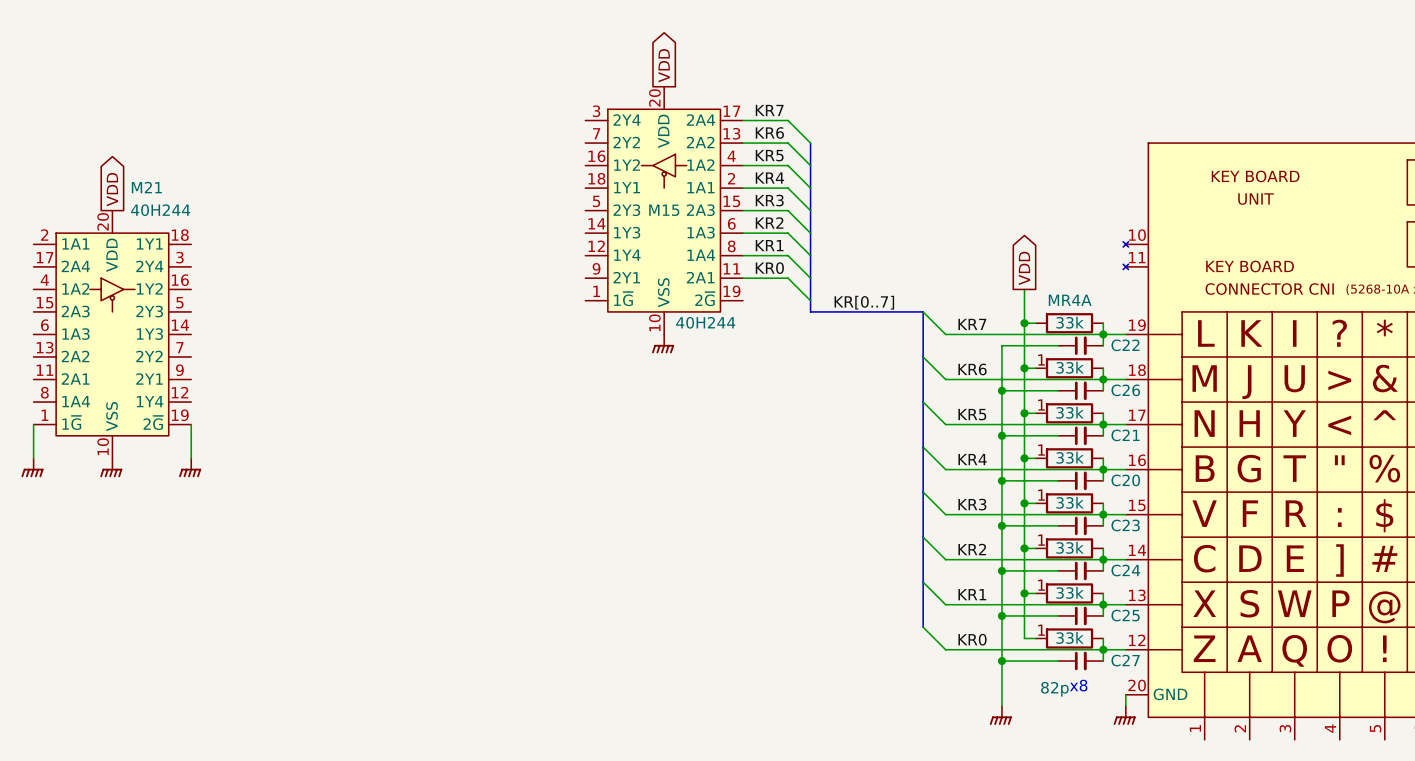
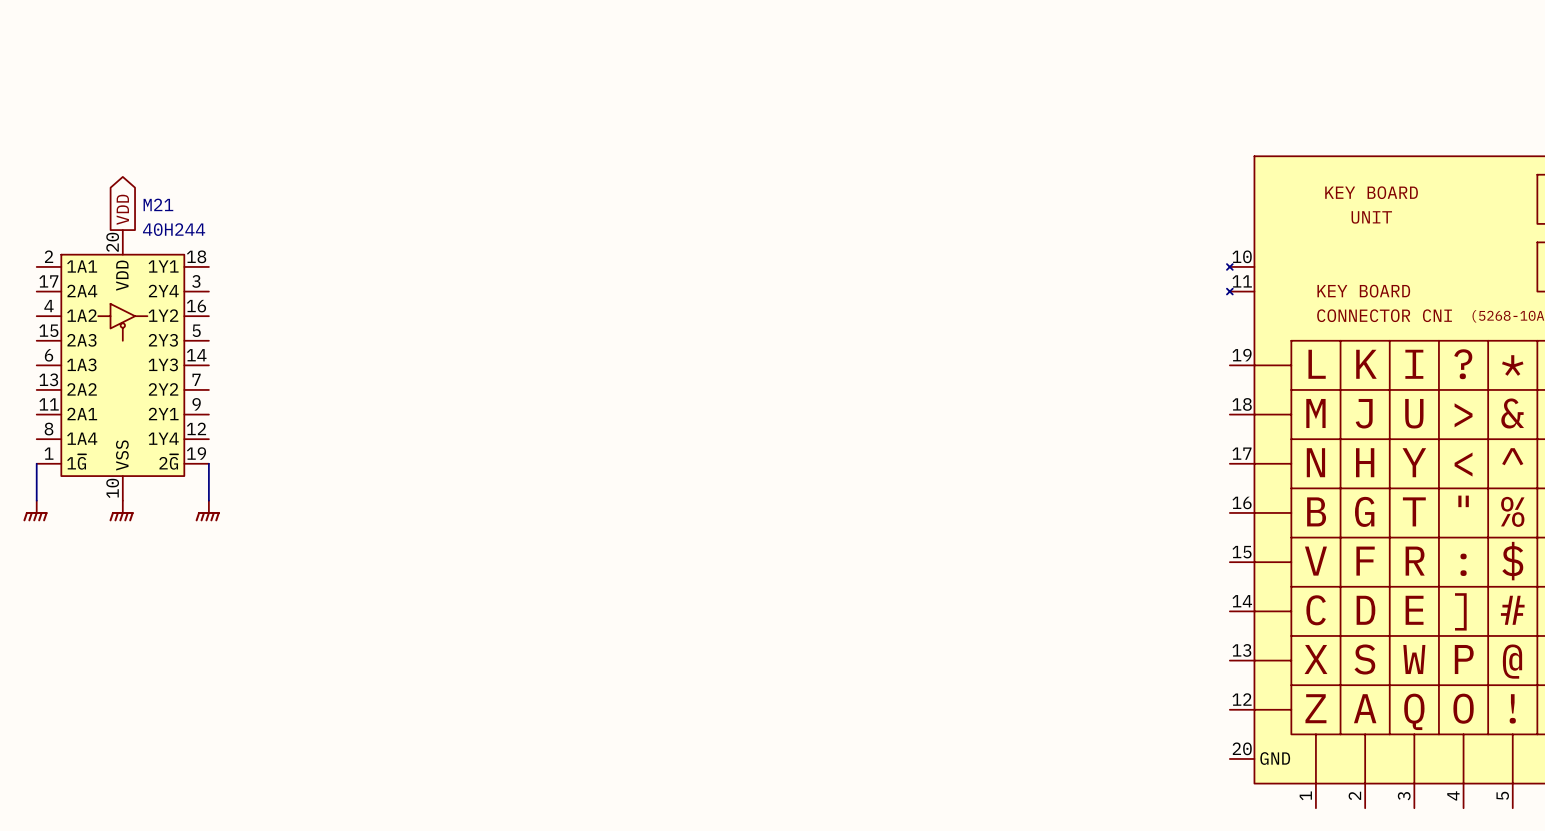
global label: VDD (664, 65) -> none
label: KR7 (769, 110) -> none
wire: (742, 120) (788, 120) (810, 143) -> none
label: KR6 (769, 133) -> none
wire: (742, 143) (788, 143) (810, 165) -> none
bus: (810, 143) (810, 311) (923, 311) (923, 627) -> none
label: KR5 (769, 155) -> none
wire: (742, 165) (788, 165) (810, 188) -> none
label: KR4 (769, 178) -> none
wire: (742, 188) (788, 188) (810, 210) -> none
label: KR3 (769, 200) -> none
M15: 40H244 (664, 210) -> none
wire: (742, 210) (788, 210) (810, 233) -> none
label: KR2 (769, 222) -> none
wire: (742, 233) (788, 233) (810, 255) -> none
label: KR1 (769, 245) -> none
wire: (742, 255) (788, 255) (810, 278) -> none
label: KR0 (769, 268) -> none
global label: VDD (1024, 268) -> none
wire: (742, 278) (788, 278) (810, 300) -> none
wire: (1024, 289) (1024, 638) (1035, 638) -> none
label: KR[0..7] (864, 302) -> none
wire: (923, 311) (945, 334) (1125, 334) -> none
wire: (1024, 323) (1035, 323) -> none
junction: (1024, 323) -> none
MR4A: 33k (1069, 323) -> none
wire: (1103, 323) (1103, 345) -> none
label: KR7 (972, 324) -> none
junction: (1103, 334) -> none
power symbol: (663, 343) -> none
wire: (1058, 345) (1001, 345) (1001, 706) -> none
C22: (1080, 345) -> none
wire: (923, 356) (945, 379) (1125, 379) -> none
wire: (1024, 368) (1035, 368) -> none
junction: (1024, 368) -> none
part: 33k (1069, 368) -> none
wire: (1103, 368) (1103, 390) -> none
label: KR6 (972, 369) -> none
junction: (1103, 379) -> none
wire: (1001, 390) (1058, 390) -> none
junction: (1001, 390) -> none
C26: (1080, 390) -> none
wire: (923, 402) (945, 424) (1125, 424) -> none
wire: (1024, 413) (1035, 413) -> none
junction: (1024, 413) -> none
part: 33k (1069, 413) -> none
wire: (1103, 413) (1103, 435) -> none
label: KR5 (972, 414) -> none
junction: (1103, 424) -> none
wire: (1001, 435) (1058, 435) -> none
junction: (1001, 435) -> none
C21: (1080, 435) -> none
wire: (923, 447) (945, 469) (1125, 469) -> none
wire: (1024, 458) (1035, 458) -> none
junction: (1024, 458) -> none
part: 33k (1069, 458) -> none
wire: (1103, 458) (1103, 480) -> none
label: KR4 (972, 459) -> none
junction: (1103, 469) -> none
wire: (1001, 480) (1058, 480) -> none
junction: (1001, 480) -> none
C20: (1080, 480) -> none
wire: (923, 492) (945, 514) (1125, 514) -> none
wire: (1024, 503) (1035, 503) -> none
junction: (1024, 503) -> none
part: 33k (1069, 503) -> none
wire: (1103, 503) (1103, 525) -> none
label: KR3 (972, 504) -> none
junction: (1103, 514) -> none
wire: (1001, 525) (1058, 525) -> none
junction: (1001, 525) -> none
C23: (1080, 525) -> none
wire: (923, 537) (945, 559) (1125, 559) -> none
wire: (1024, 548) (1035, 548) -> none
junction: (1024, 548) -> none
part: 33k (1069, 548) -> none
wire: (1103, 548) (1103, 570) -> none
label: KR2 (972, 549) -> none
junction: (1103, 559) -> none
wire: (1001, 570) (1058, 570) -> none
junction: (1001, 570) -> none
C24: (1080, 570) -> none
wire: (923, 582) (945, 604) (1125, 604) -> none
wire: (1024, 593) (1035, 593) -> none
junction: (1024, 593) -> none
part: 33k (1069, 593) -> none
wire: (1103, 593) (1103, 615) -> none
label: KR1 (972, 594) -> none
junction: (1103, 604) -> none
wire: (1001, 615) (1058, 615) -> none
junction: (1001, 615) -> none
C25: (1080, 615) -> none
wire: (923, 627) (945, 649) (1125, 649) -> none
part: 33k (1069, 638) -> none
wire: (1103, 638) (1103, 661) -> none
label: KR0 (972, 639) -> none
junction: (1103, 649) -> none
wire: (1001, 661) (1058, 661) -> none
junction: (1001, 661) -> none
C27: 82p (1080, 661) -> none
text: x8 (1078, 685) -> none
wire: (1125, 694) (1125, 706) -> none
power symbol: (1000, 715) -> none
power symbol: (1124, 715) -> none

